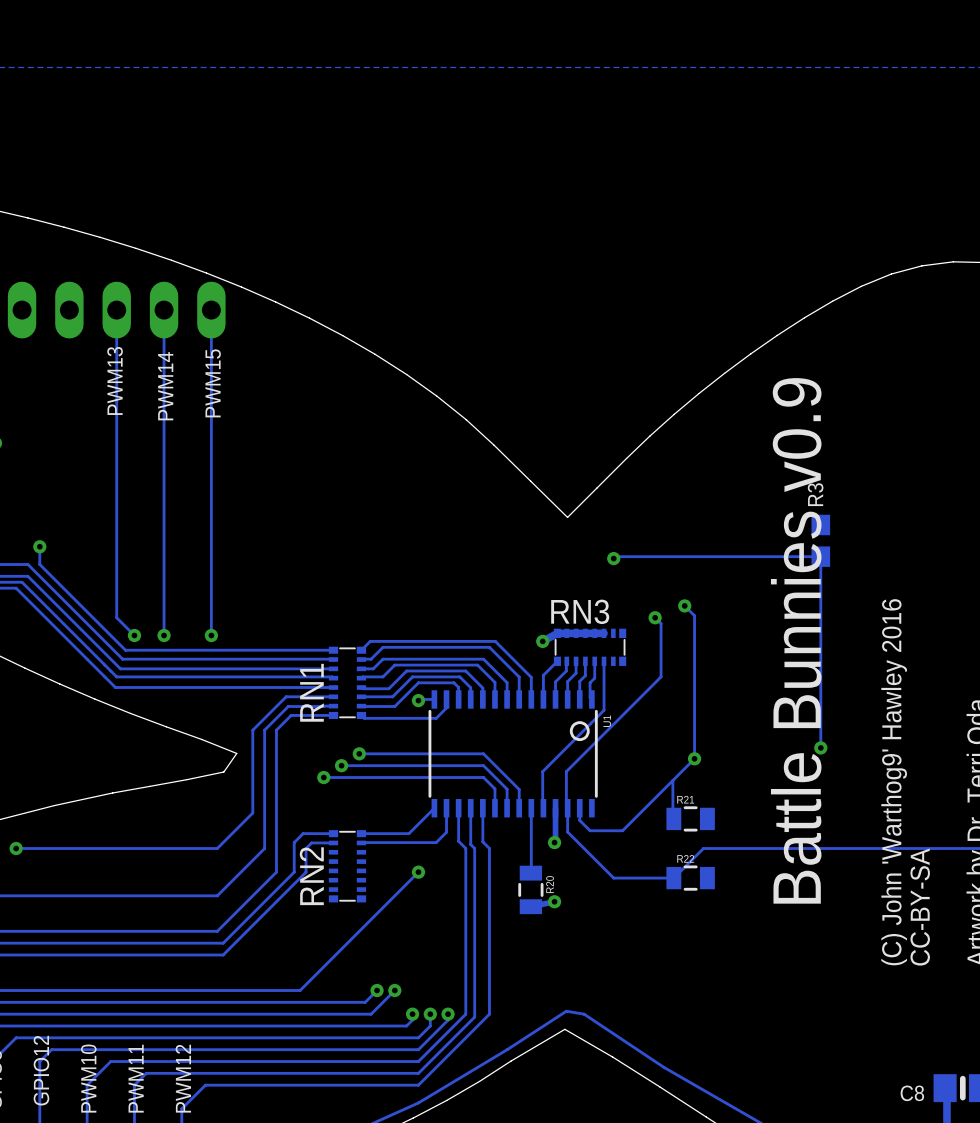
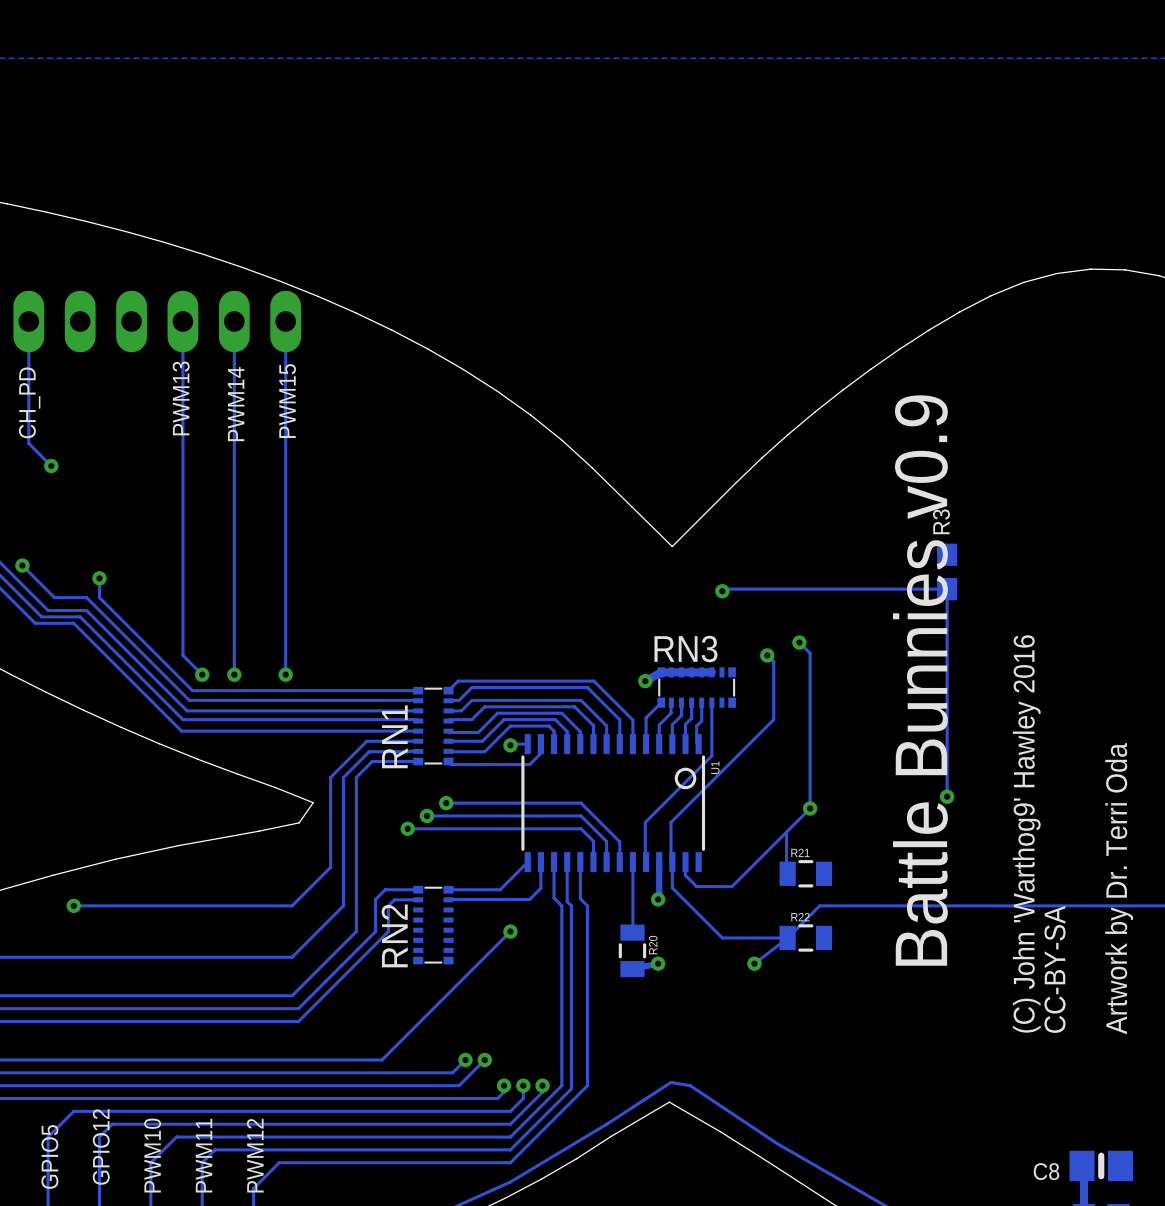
track: none -> (787, 937) (754, 963)
via: none -> (754, 963)

